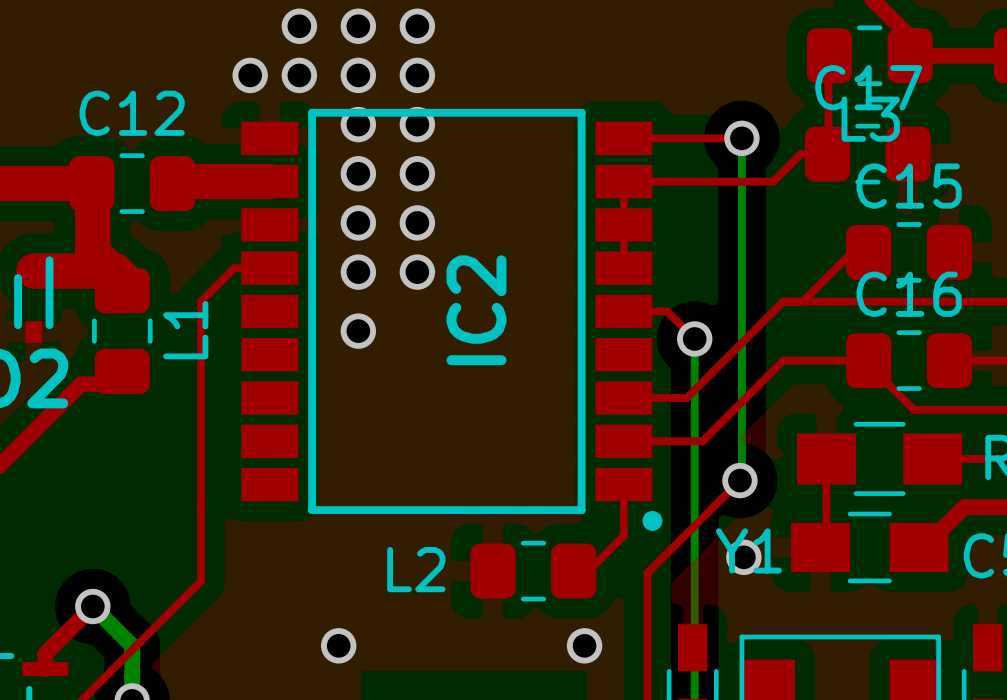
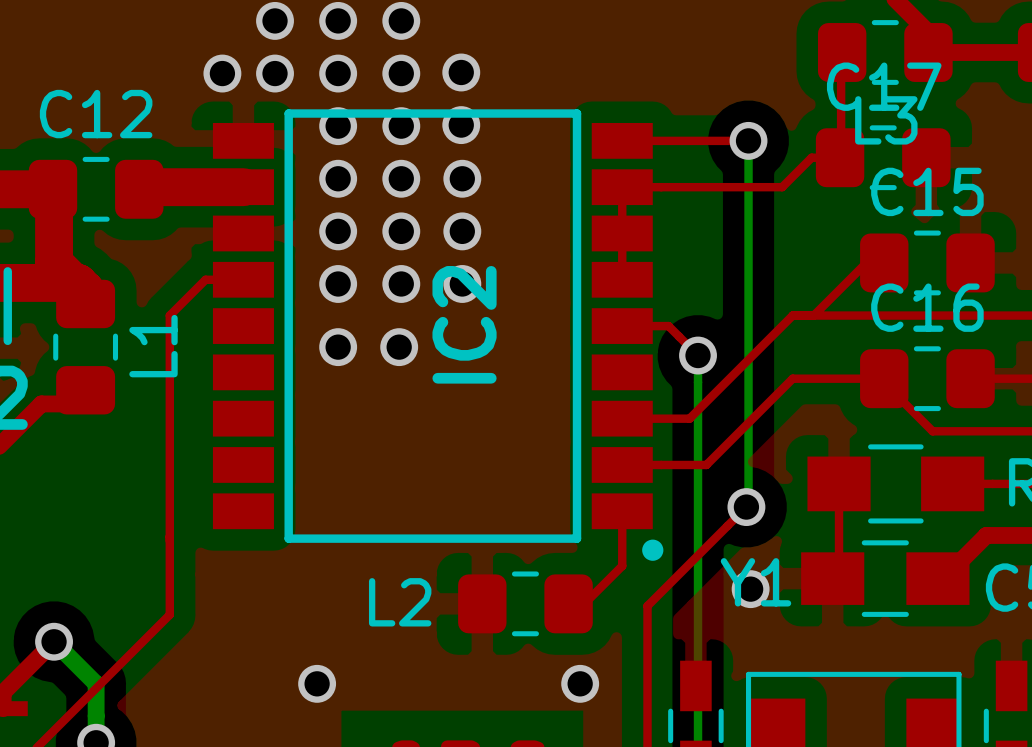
via: none -> (461, 72)
via: none -> (461, 125)
via: none -> (462, 178)
via: none -> (462, 231)
via: none -> (462, 283)
via: none -> (399, 347)

